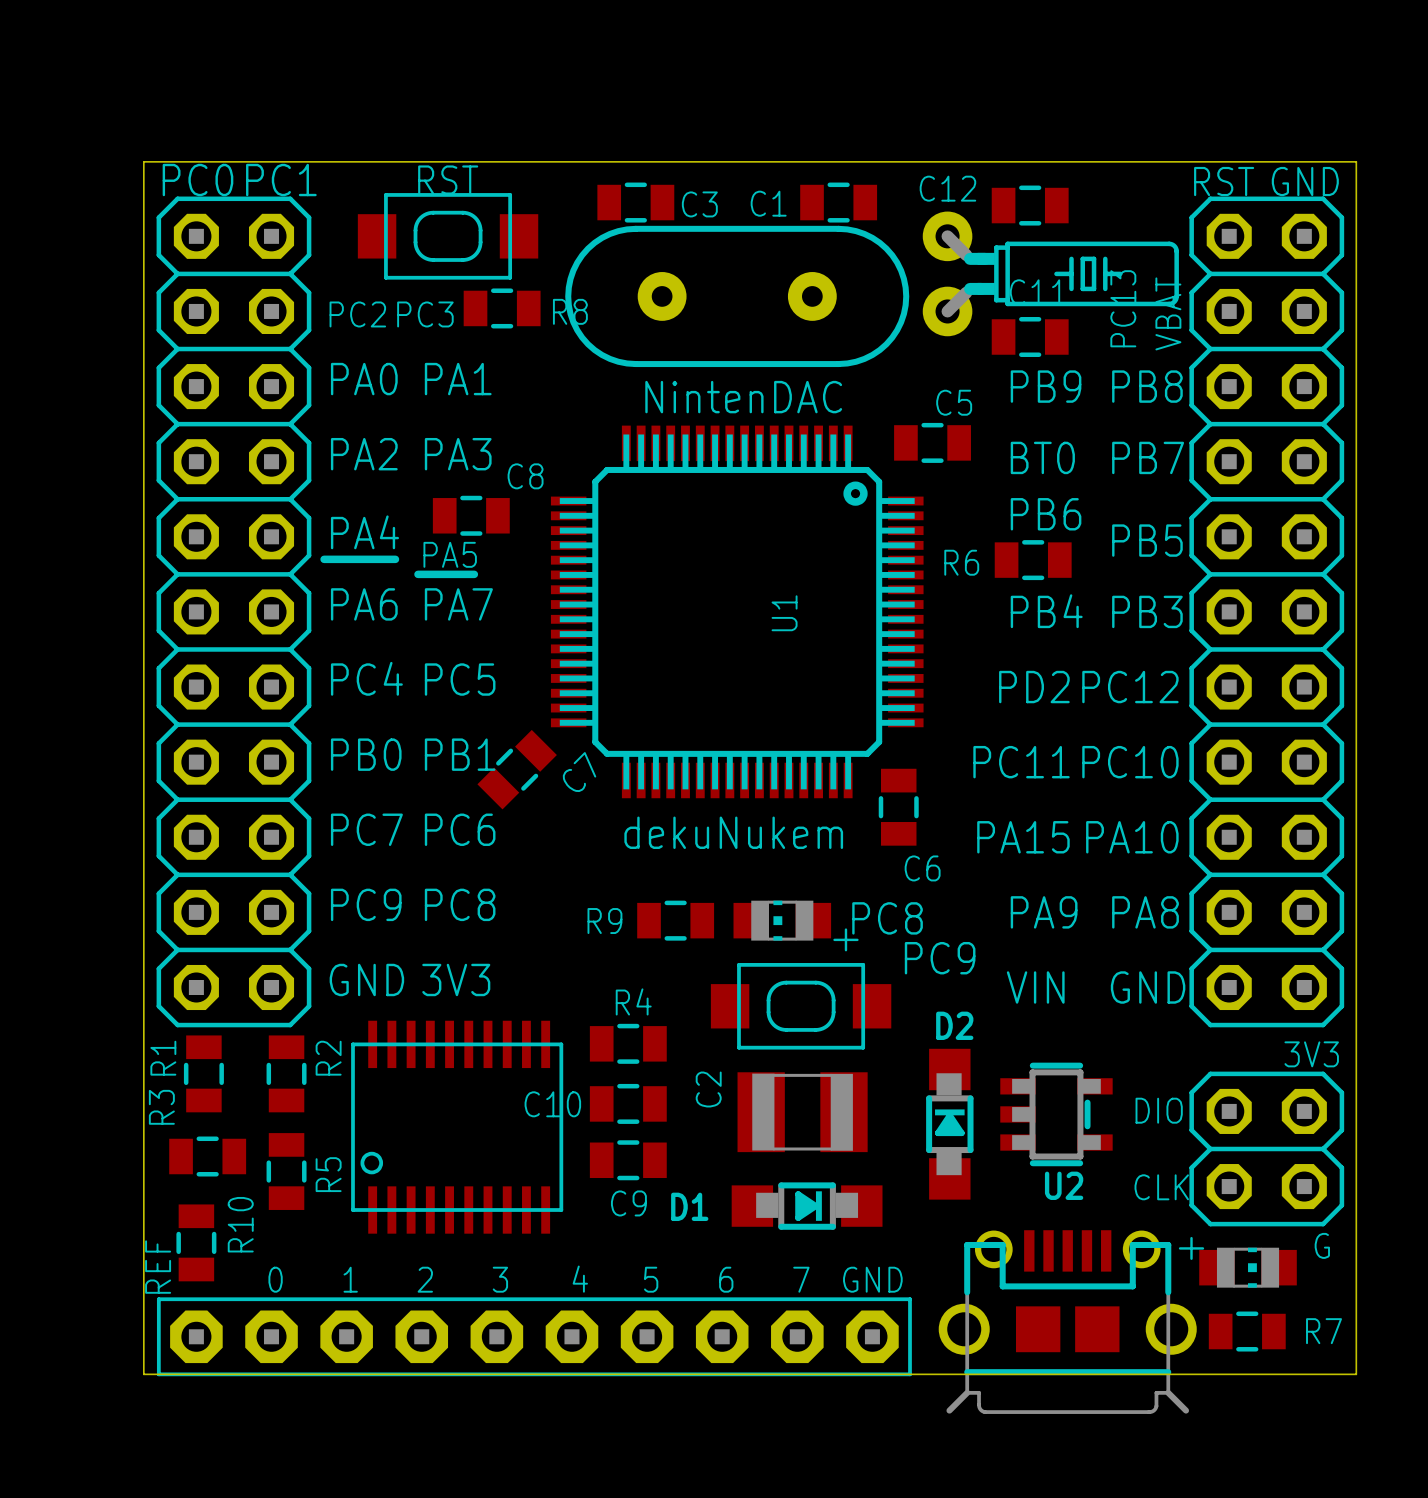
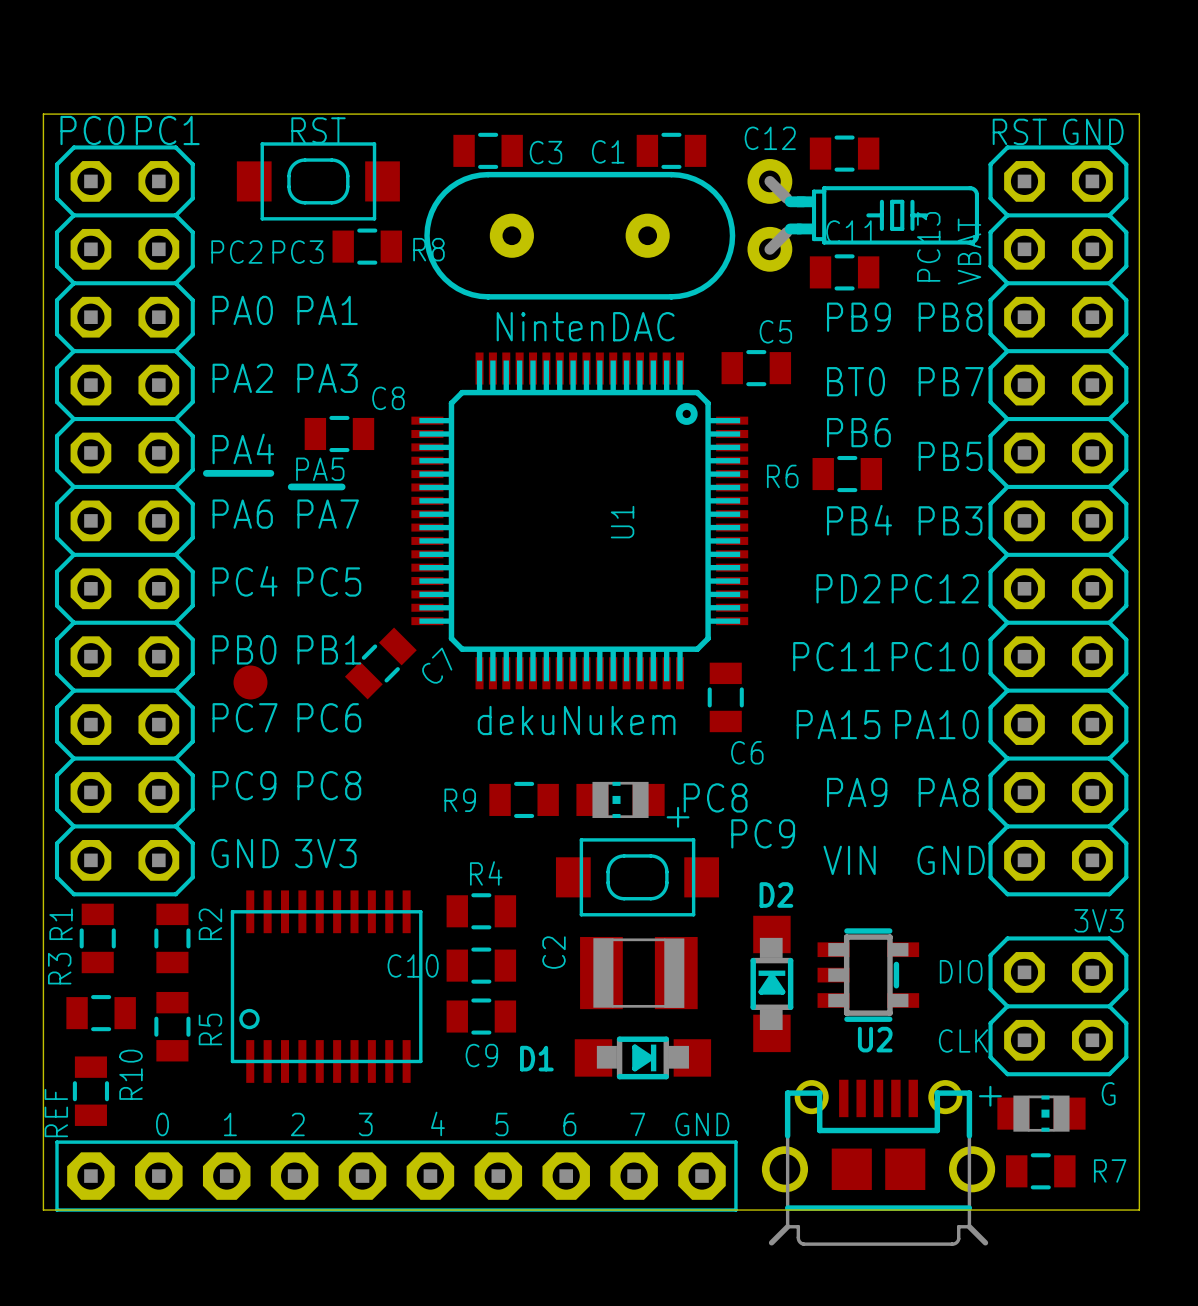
part: none -> (250, 682)

